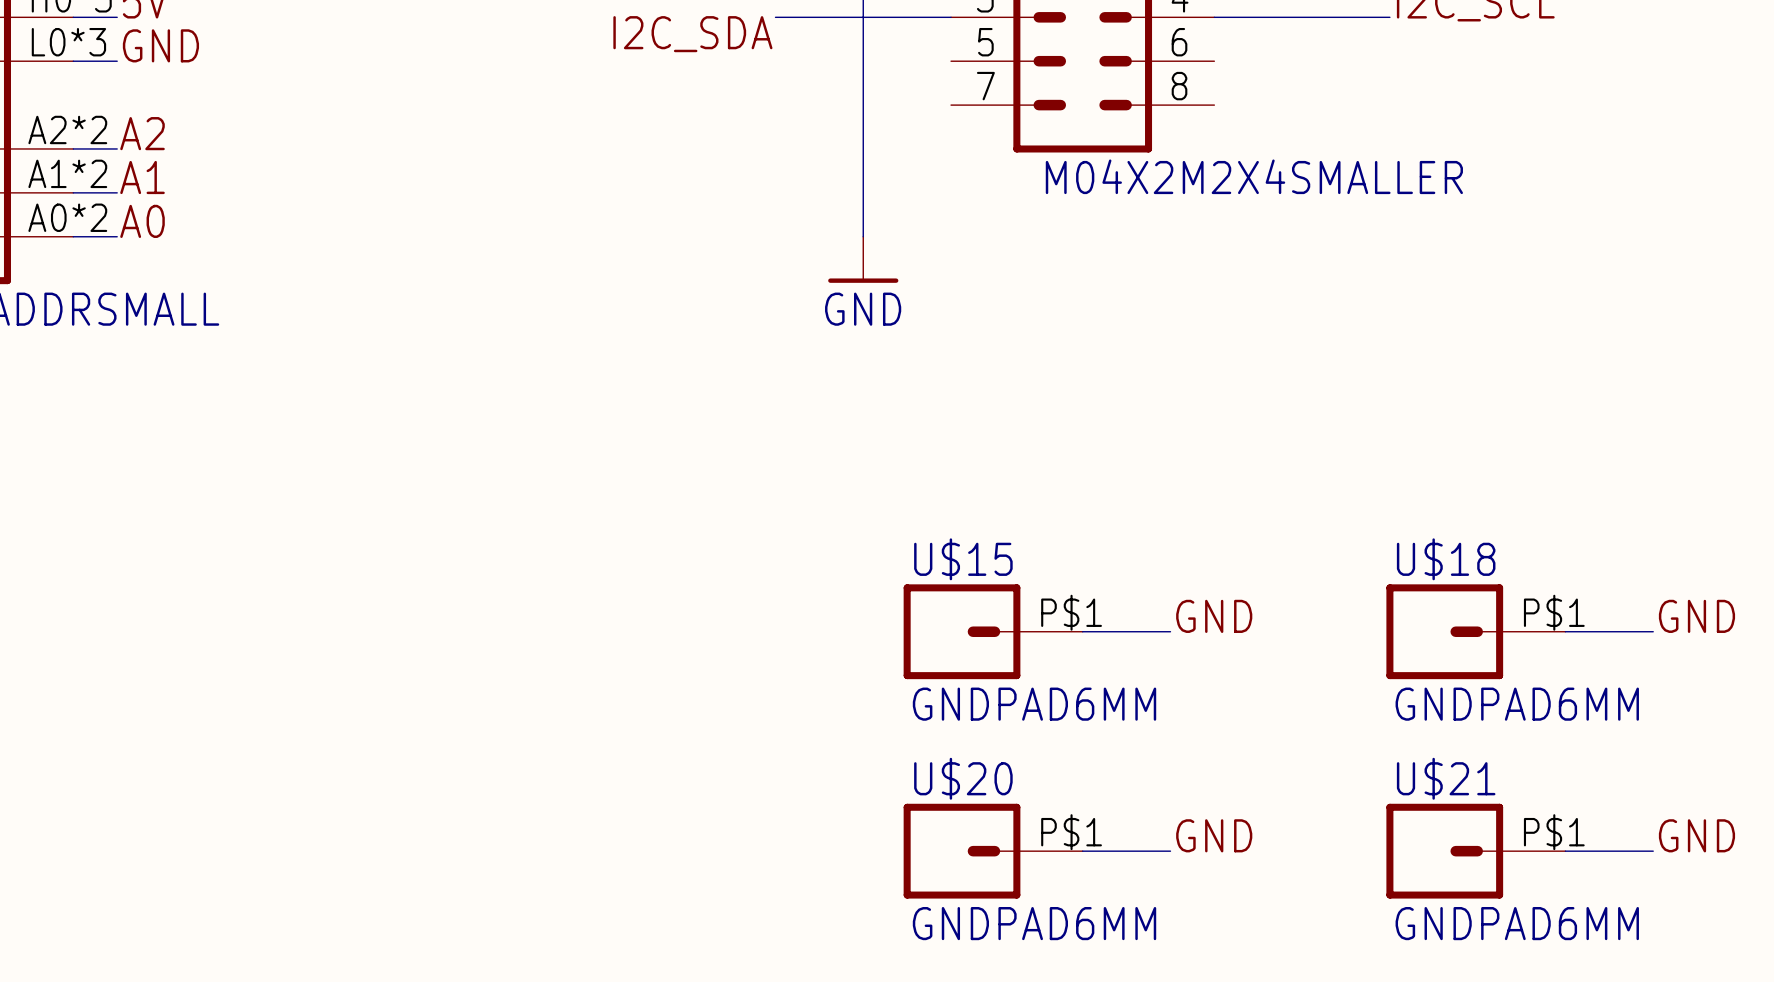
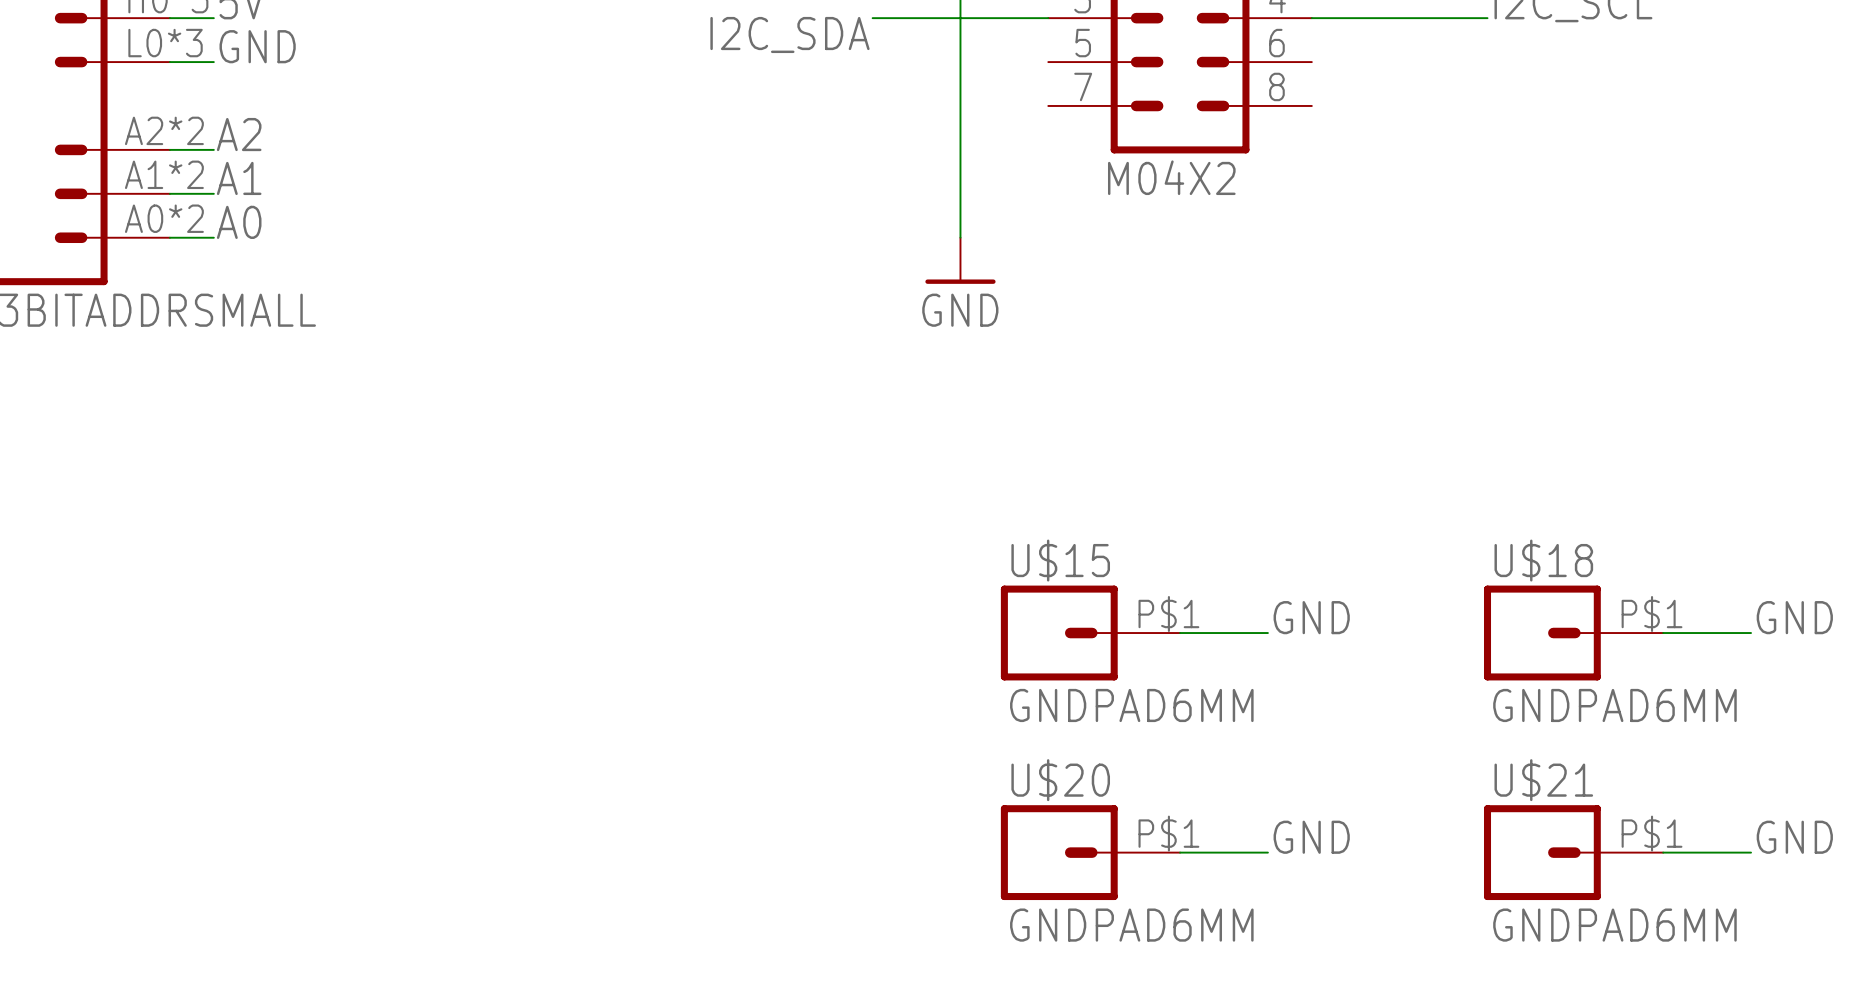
part value: M04X2M2X4SMALLER (1254, 176) -> M04X2 (1171, 177)

